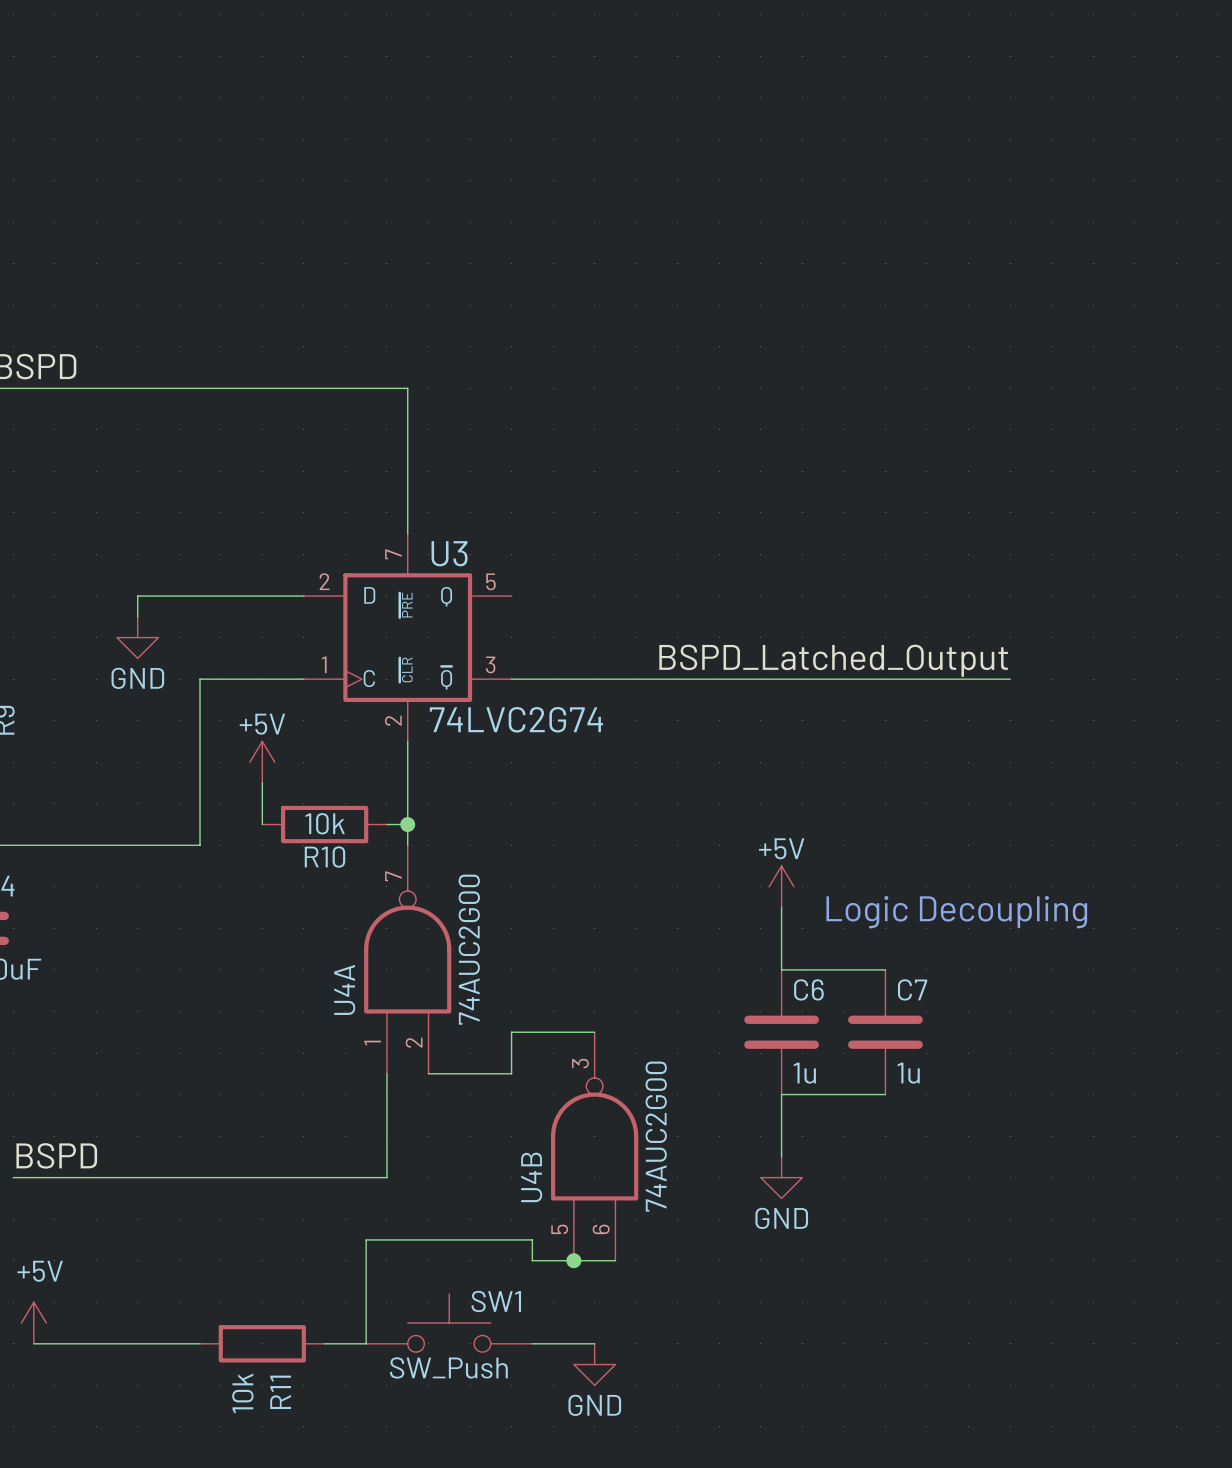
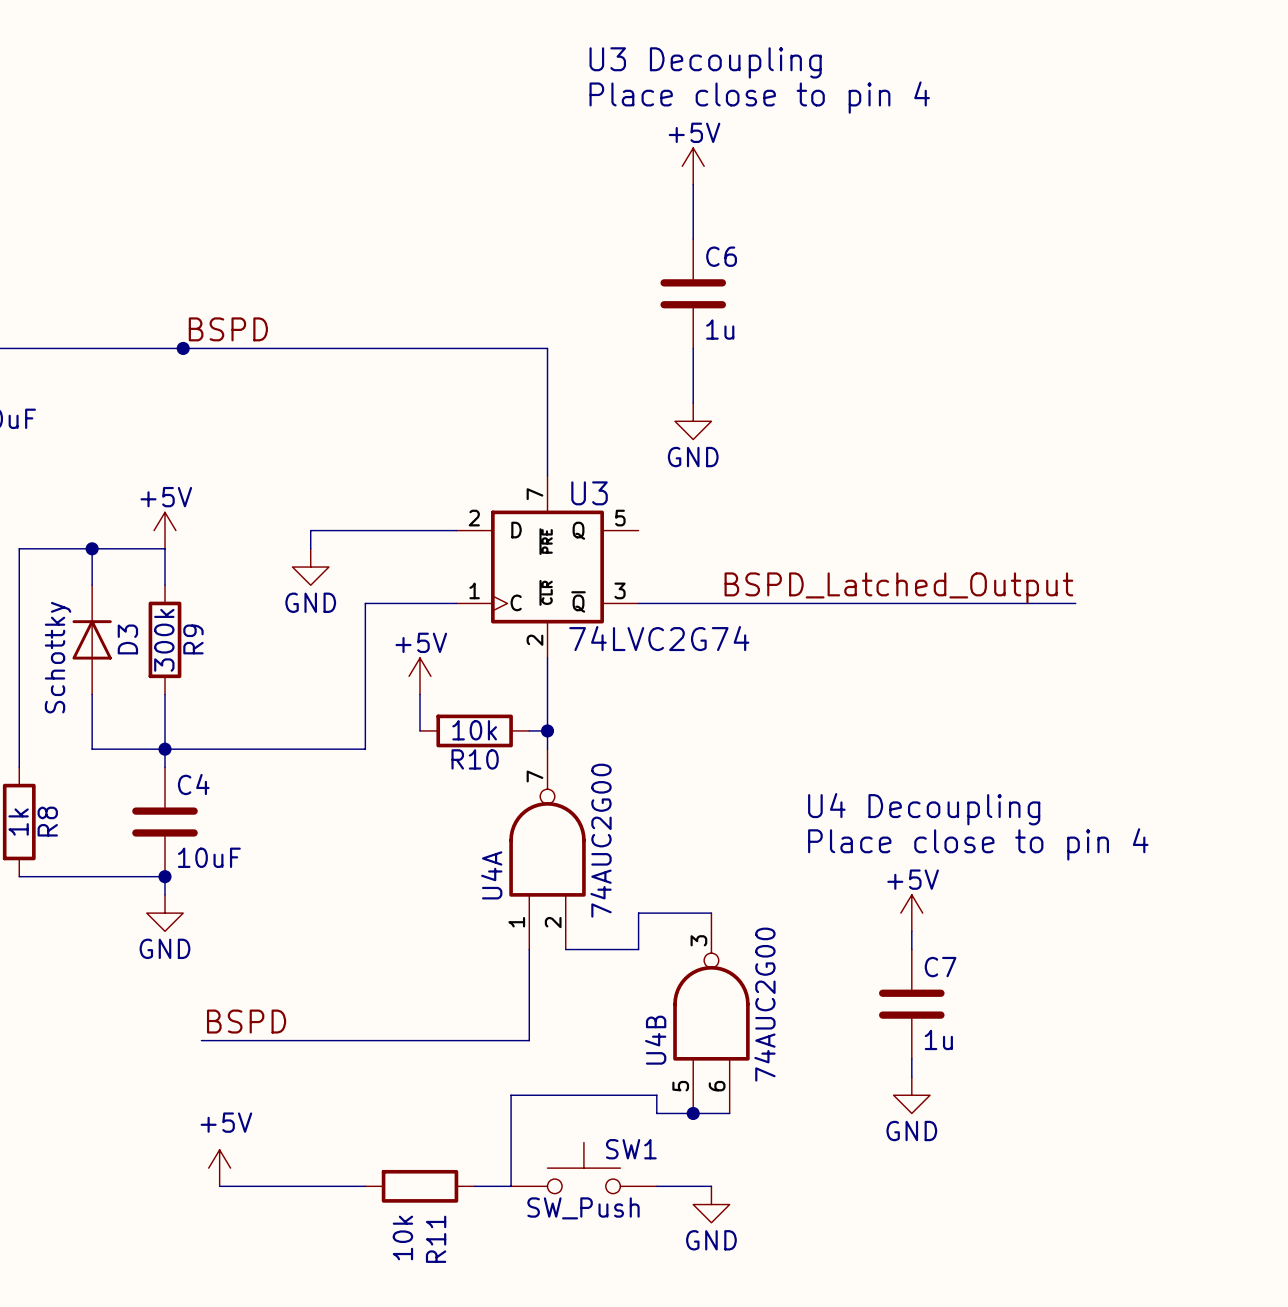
text: none -> U3 Decoupling (705, 62)
text: none -> Place close to pin 4 (759, 97)
power symbol: none -> +5V (693, 166)
wire: none -> (693, 184) (693, 239)
wire: none -> (693, 348) (693, 403)
power symbol: none -> GND (693, 421)
power symbol position: +5V (781, 886) -> +5V (911, 913)
wire: (781, 907) (781, 969) (885, 969) -> none
text: Logic Decoupling (956, 912) -> U4 Decoupling (924, 809)
text: none -> Place close to pin 4 (978, 844)
C6 position: (781, 1032) -> (693, 293)
C7 position: (885, 1032) -> (911, 1004)
wire: none -> (911, 931) (911, 949)
wire: (885, 1094) (781, 1094) (781, 1156) -> none
power symbol position: GND (781, 1177) -> GND (911, 1095)
wire: none -> (911, 1058) (911, 1077)

